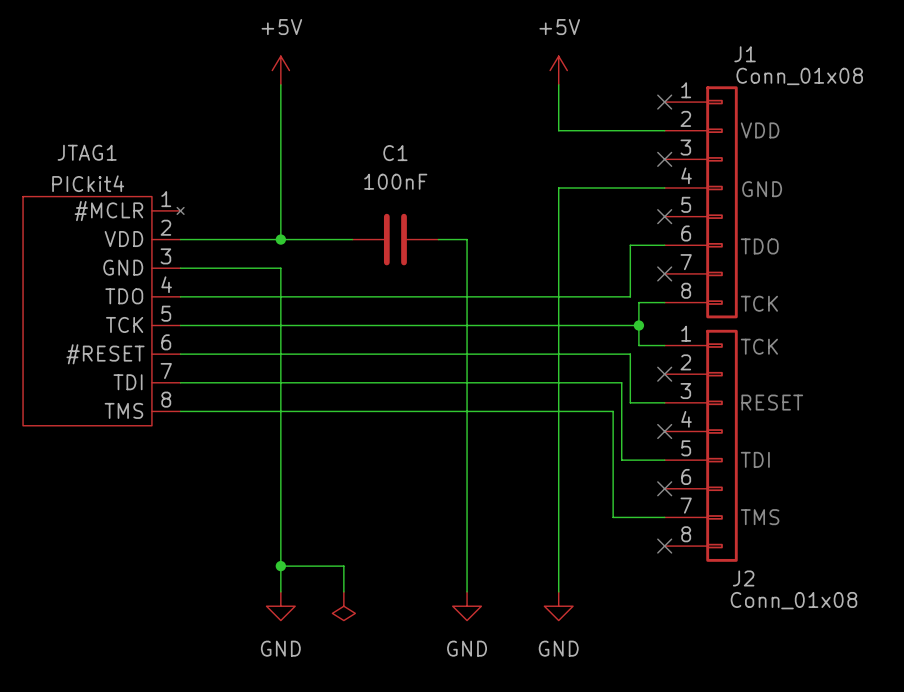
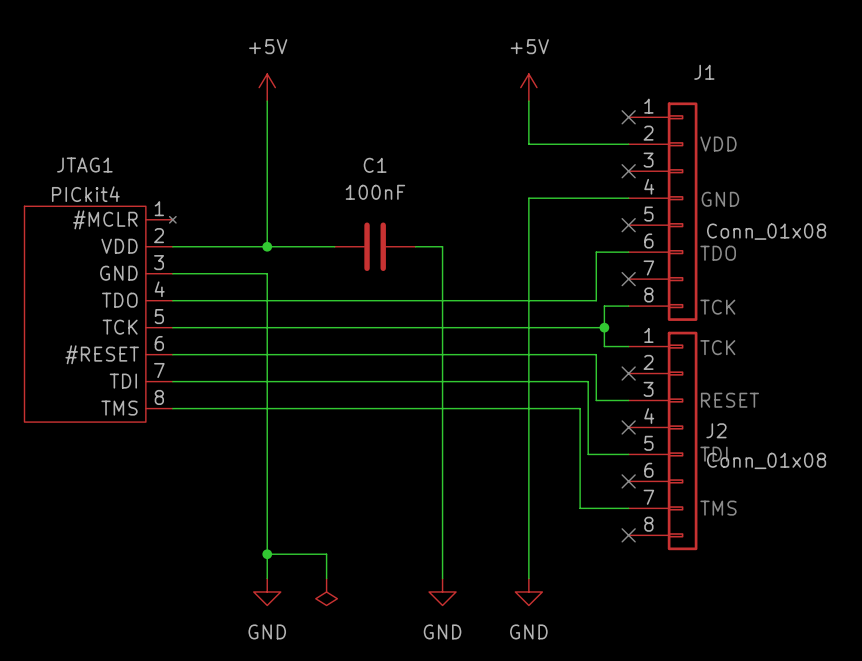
J1 value position: Conn_01x08 (799, 76) -> Conn_01x08 (766, 231)
J2 name position: J2 (743, 578) -> J2 (716, 430)
J2 value position: Conn_01x08 (793, 600) -> Conn_01x08 (766, 460)

